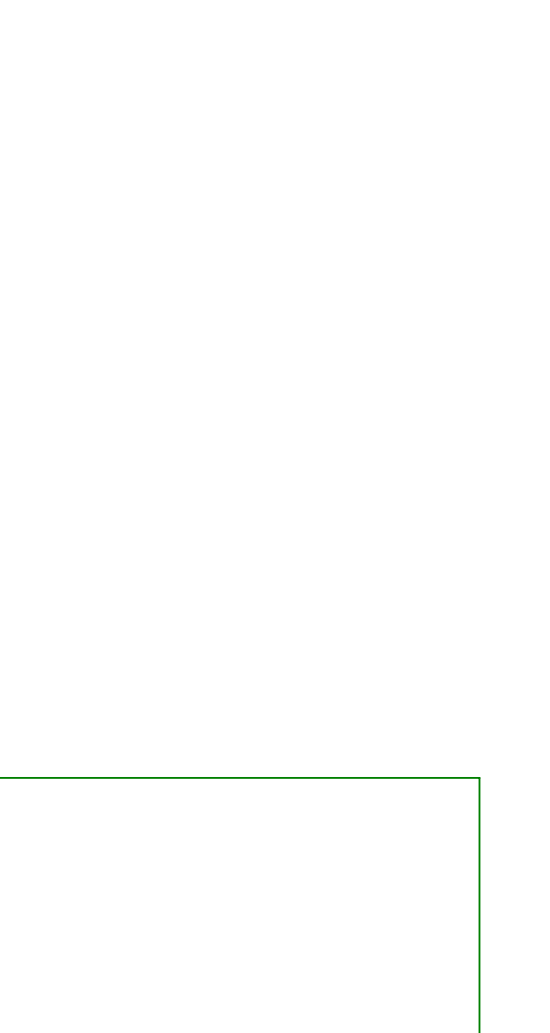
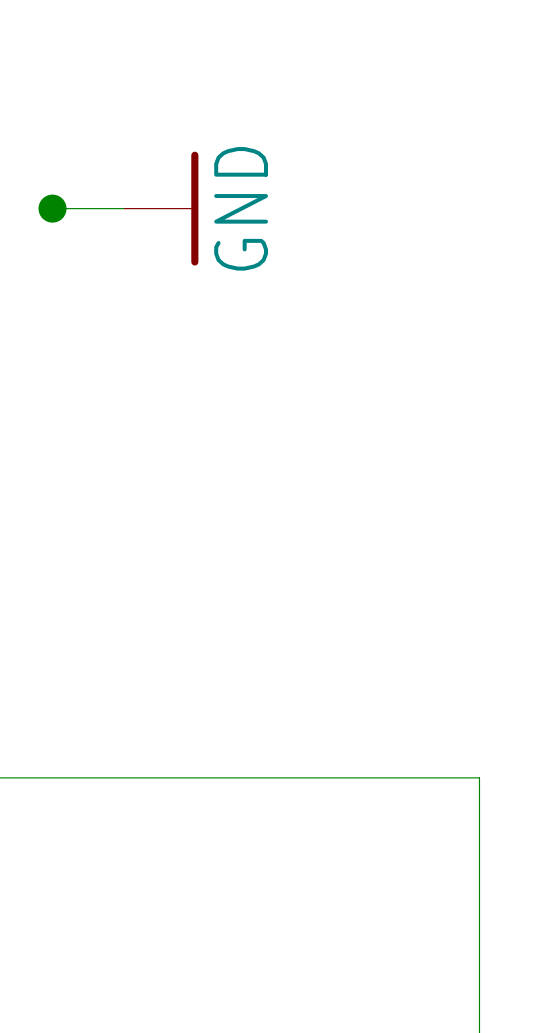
wire: none -> (52, 208) (123, 208)
junction: none -> (52, 208)
power symbol: none -> GND (161, 208)

